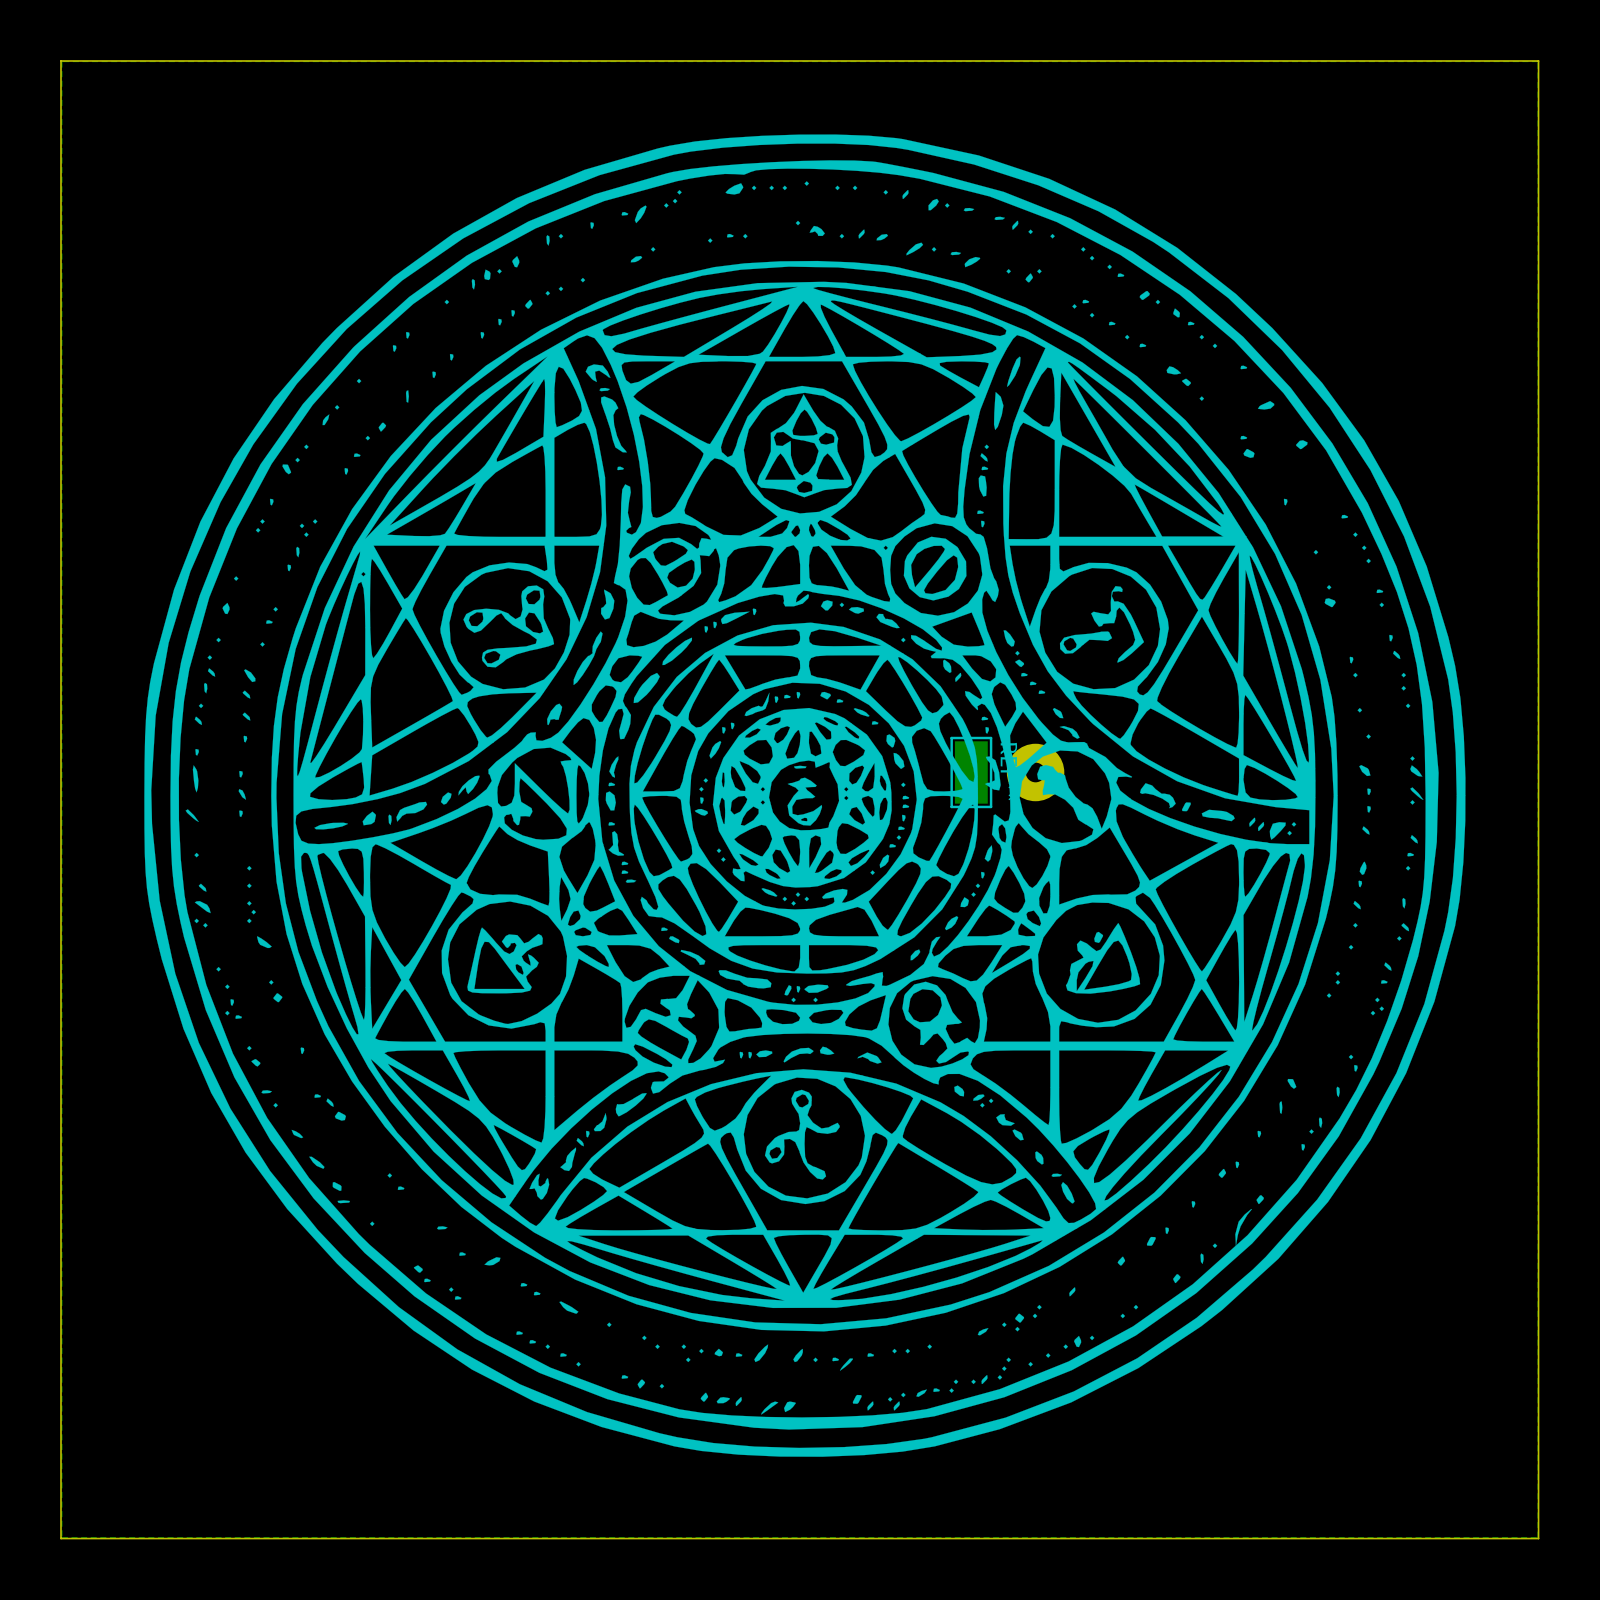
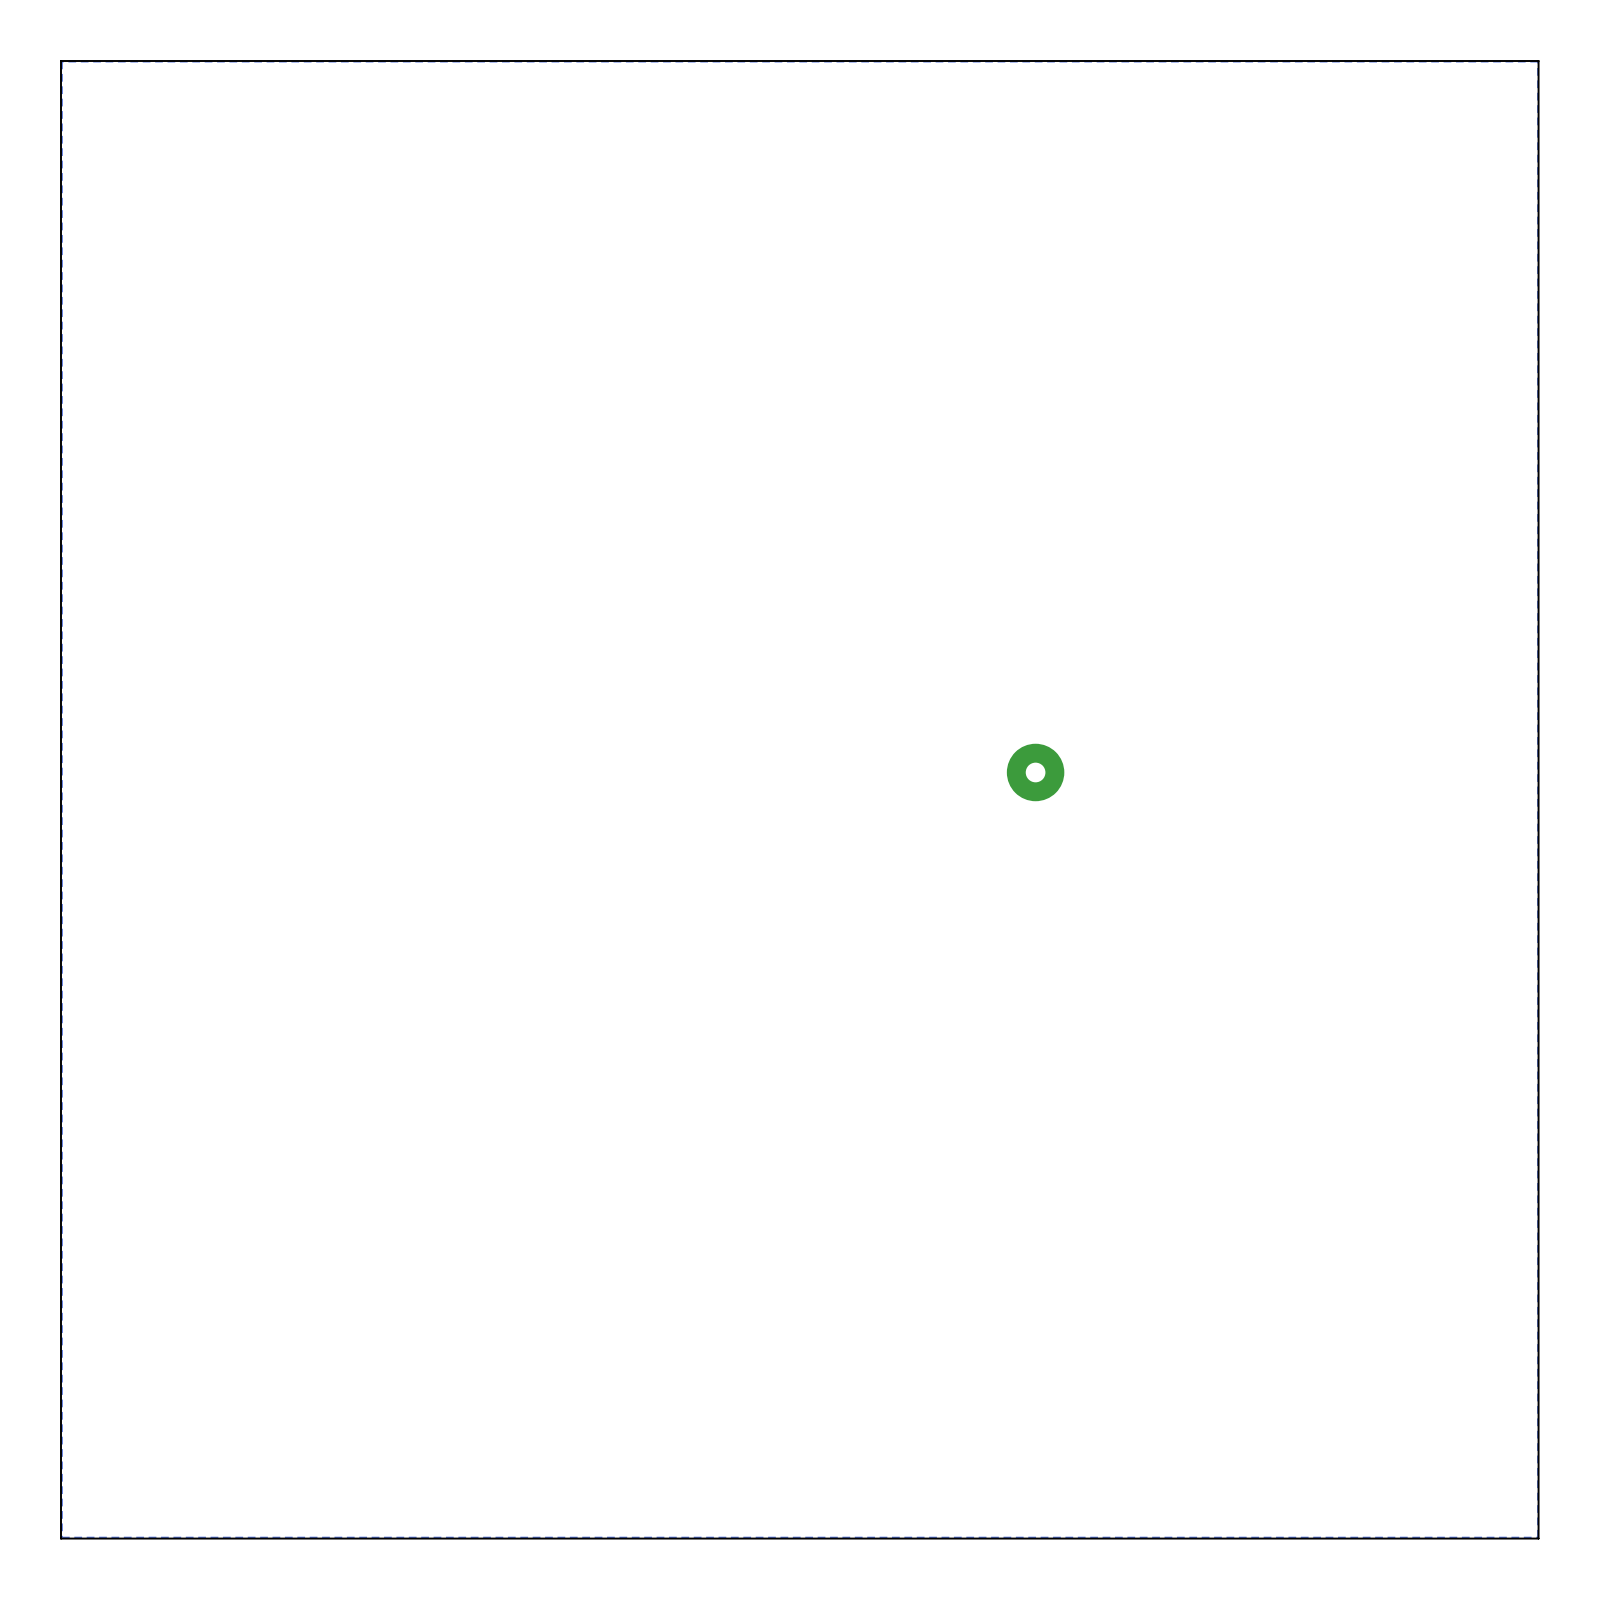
drawing: [144, 134, 1466, 1457] -> none
part: (971, 772) -> none

